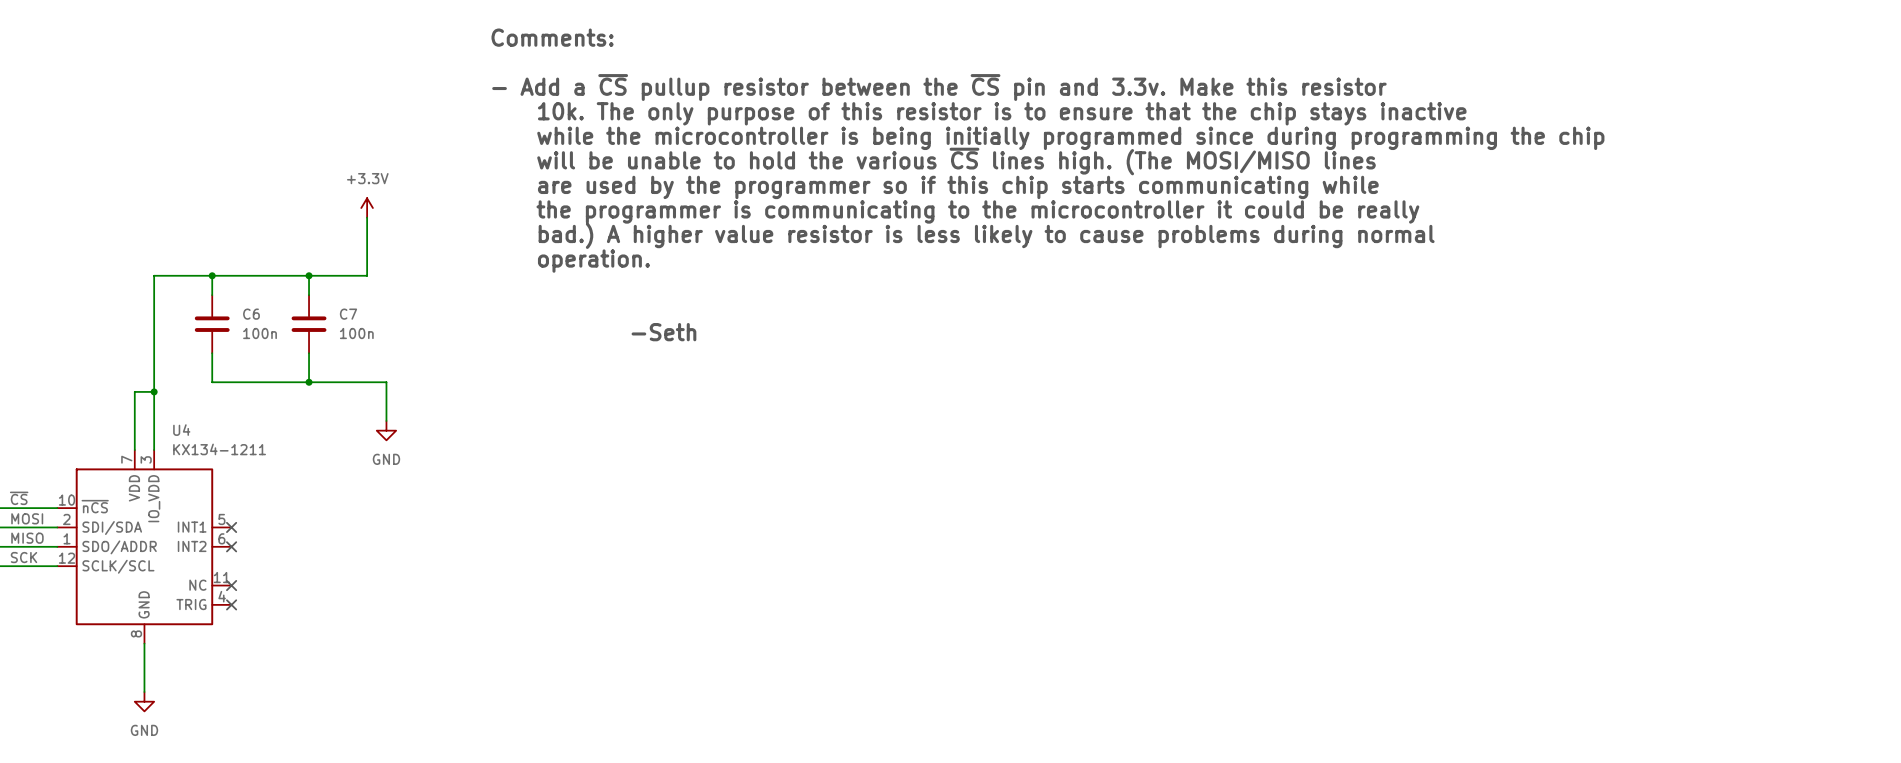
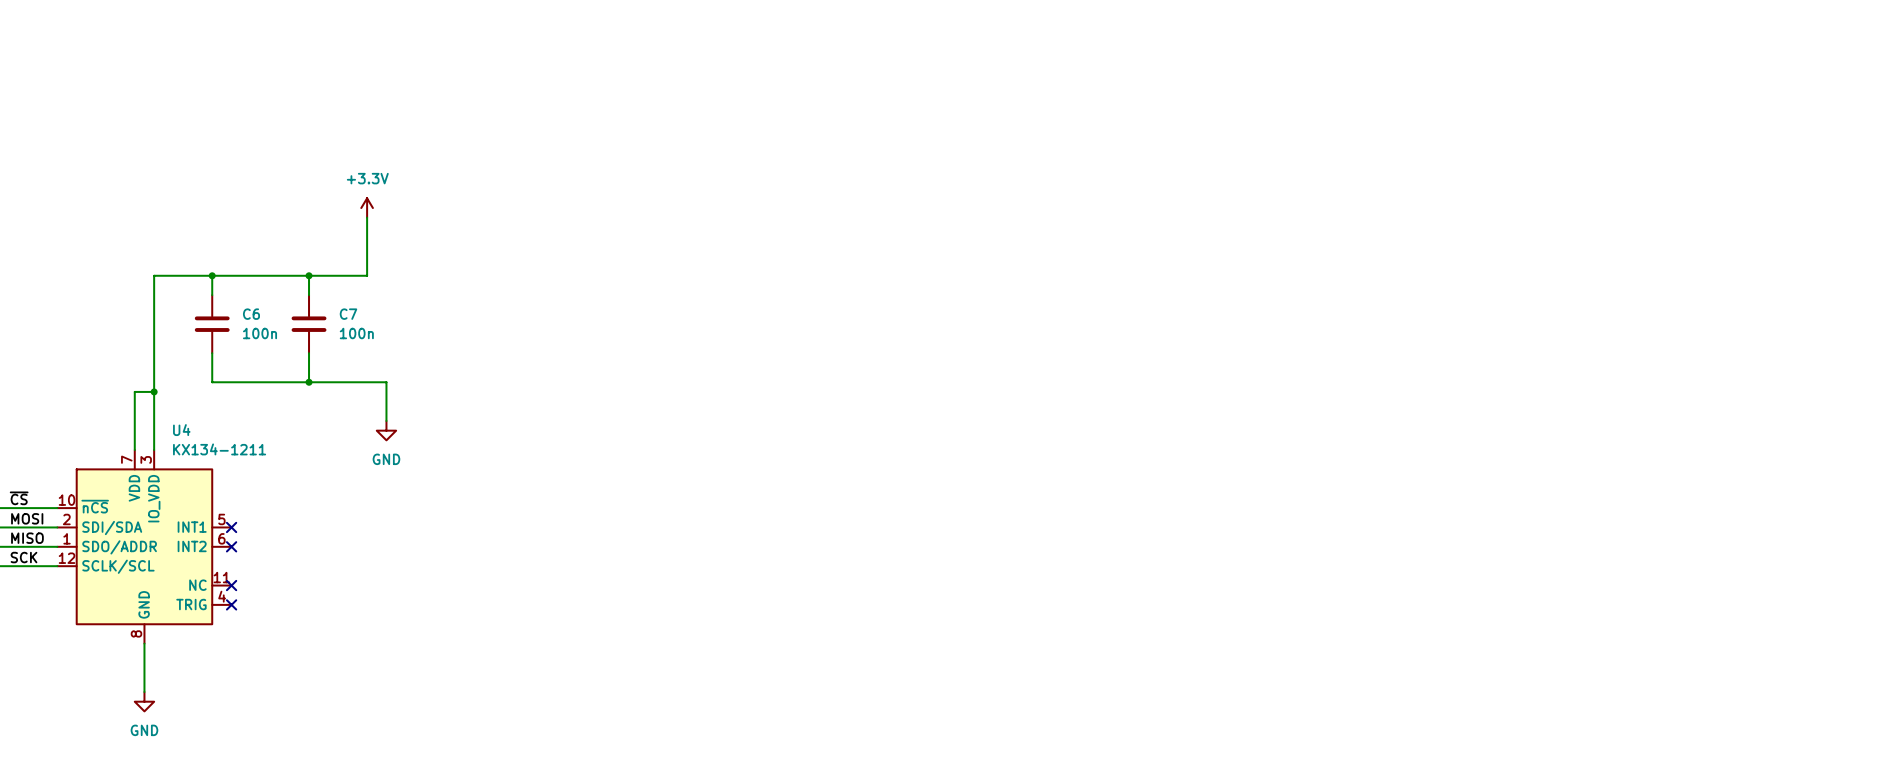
text: Comments: (552, 37) -> none
text: - Add a ~{CS} pullup resistor between the ~{CS} pin and 3.3v. Make this resistor (939, 87) -> none
text: 10k. The only purpose of this resistor is to ensure that the chip stays inactive (1002, 113) -> none
text: while the microcontroller is being initially programmed since during programming the chip (1070, 138) -> none
text: will be unable to hold the various ~{CS} lines high. (The MOSI/MISO lines (956, 161) -> none
text: are used by the programmer so if this chip starts communicating while (958, 187) -> none
text: the programmer is communicating to the microcontroller it could be really (977, 211) -> none
text: bad.) A higher value resistor is less likely to cause problems during normal (986, 235) -> none
text: operation. (593, 261) -> none
text: -Seth (663, 332) -> none

